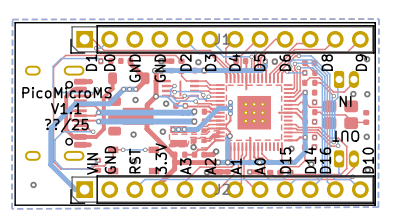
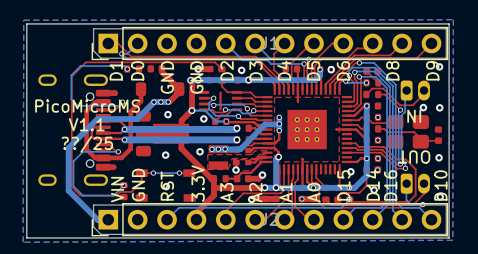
via: (33, 184) -> none

